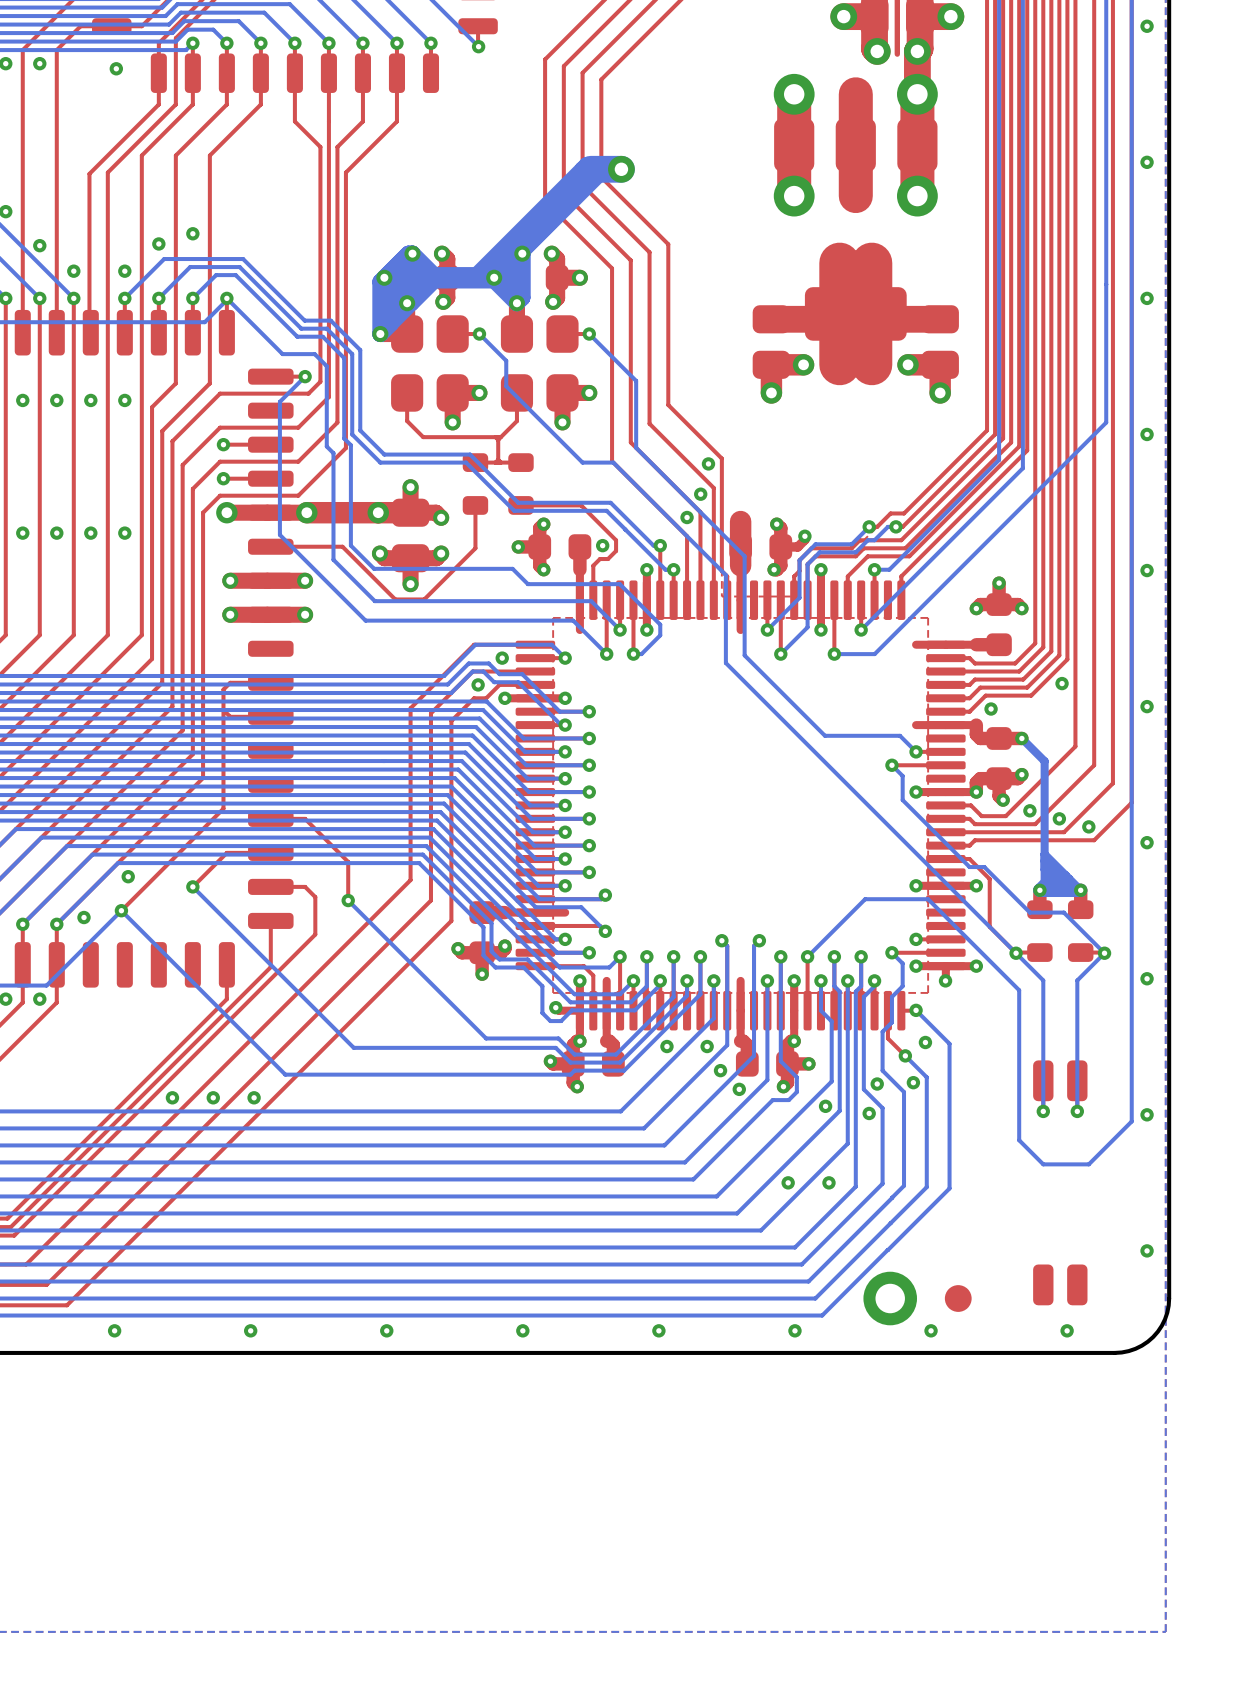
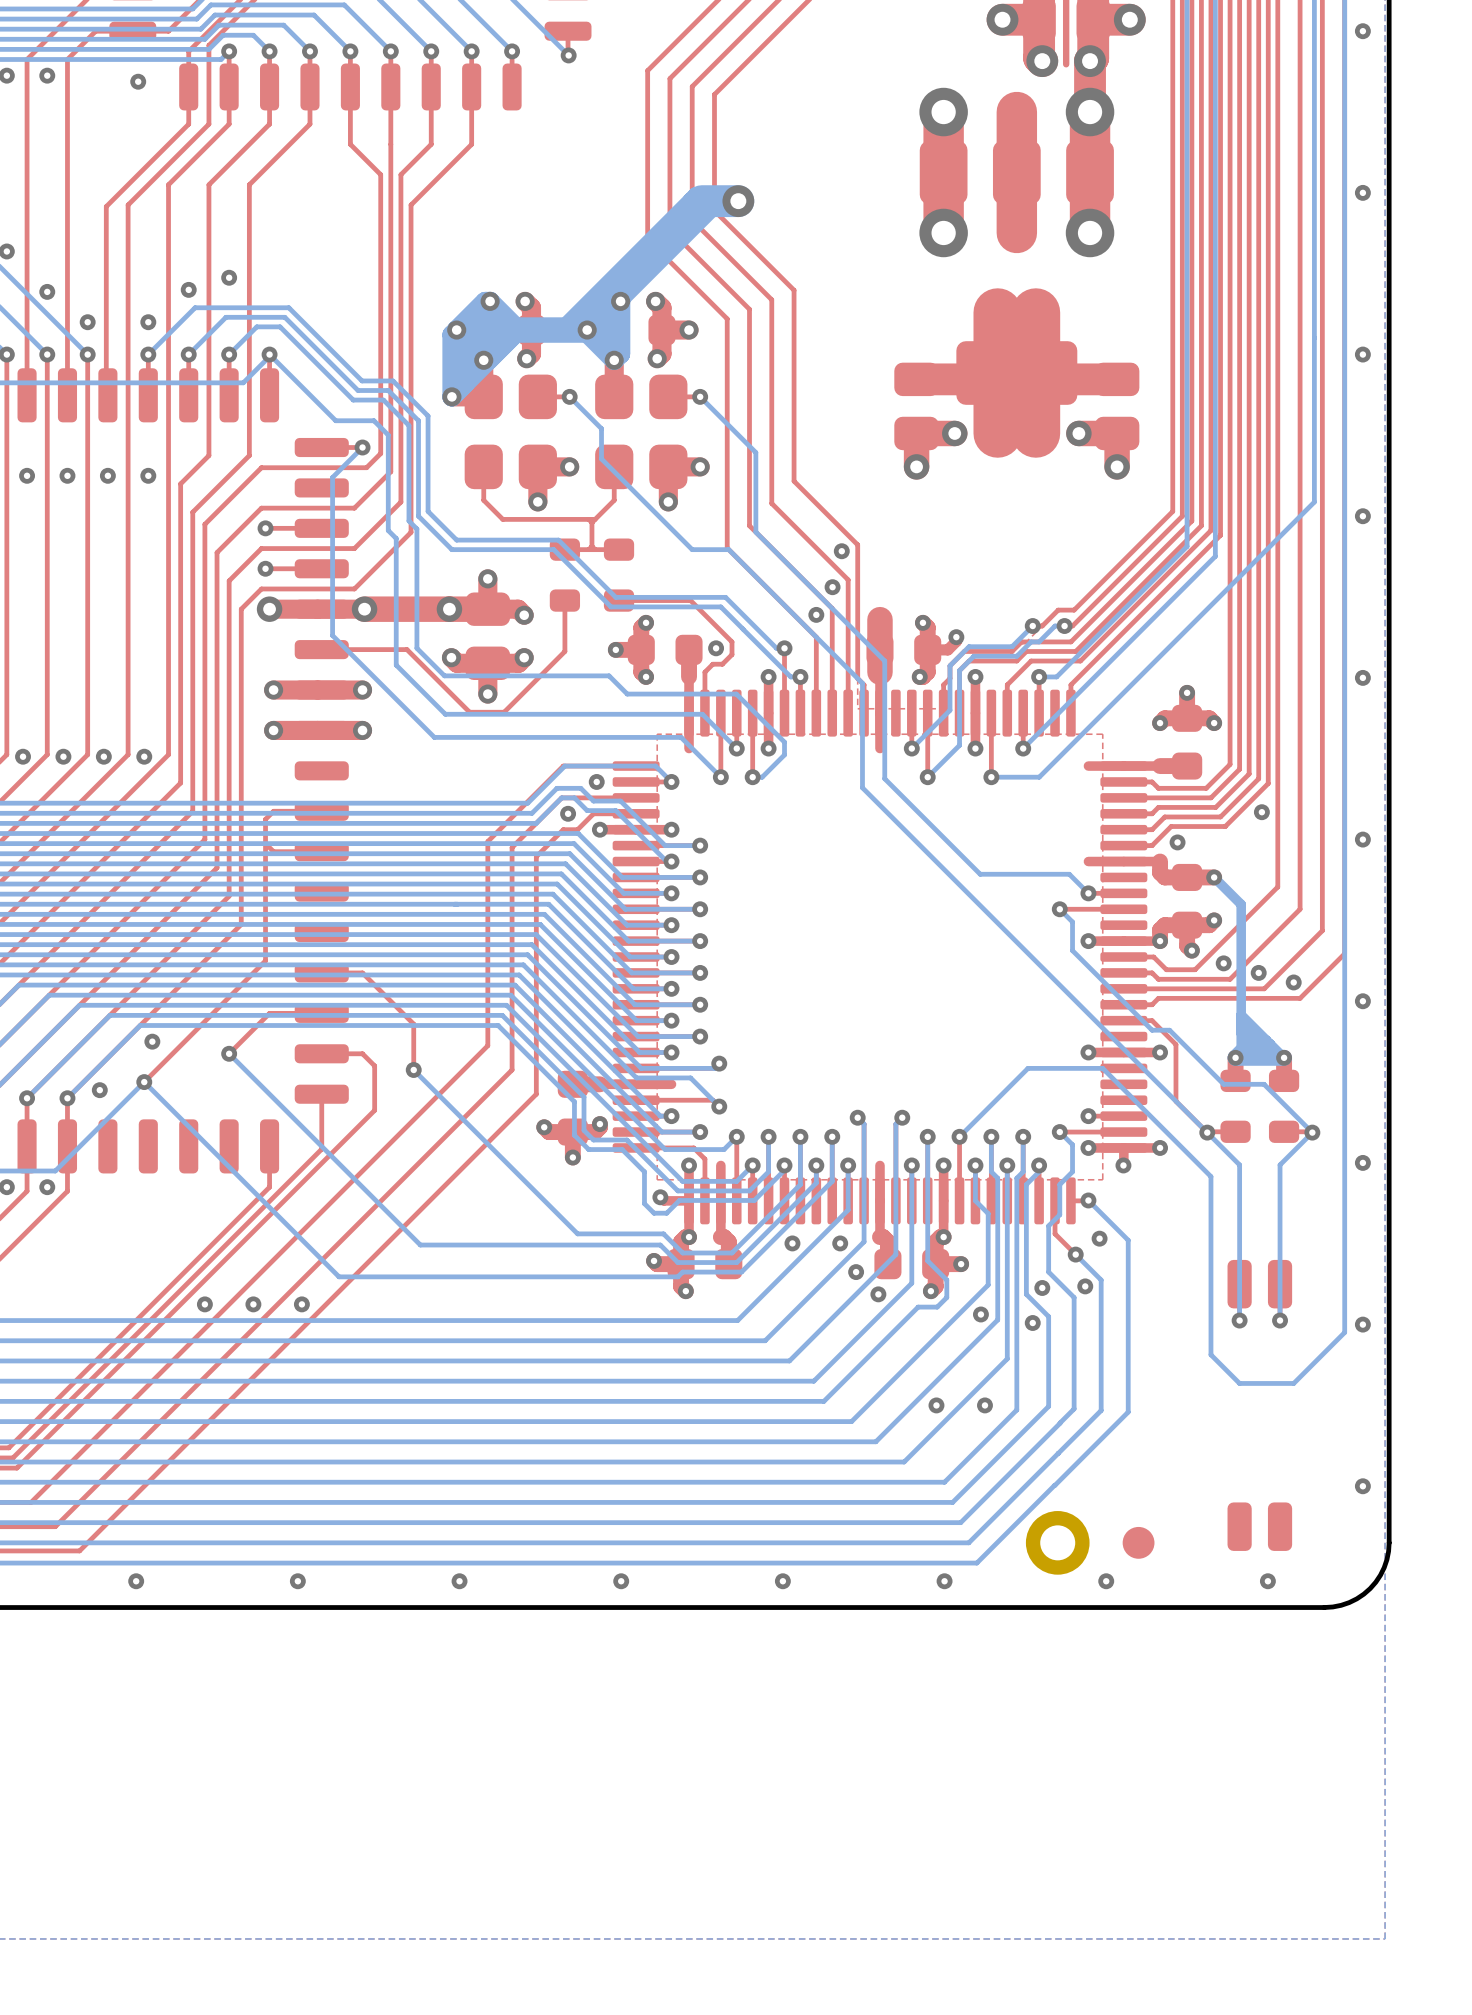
via: (22, 533) -> none
via: (56, 533) -> none
via: (90, 533) -> none
via: (124, 533) -> none
via: none -> (23, 756)
via: none -> (63, 756)
via: none -> (103, 756)
via: none -> (144, 756)

